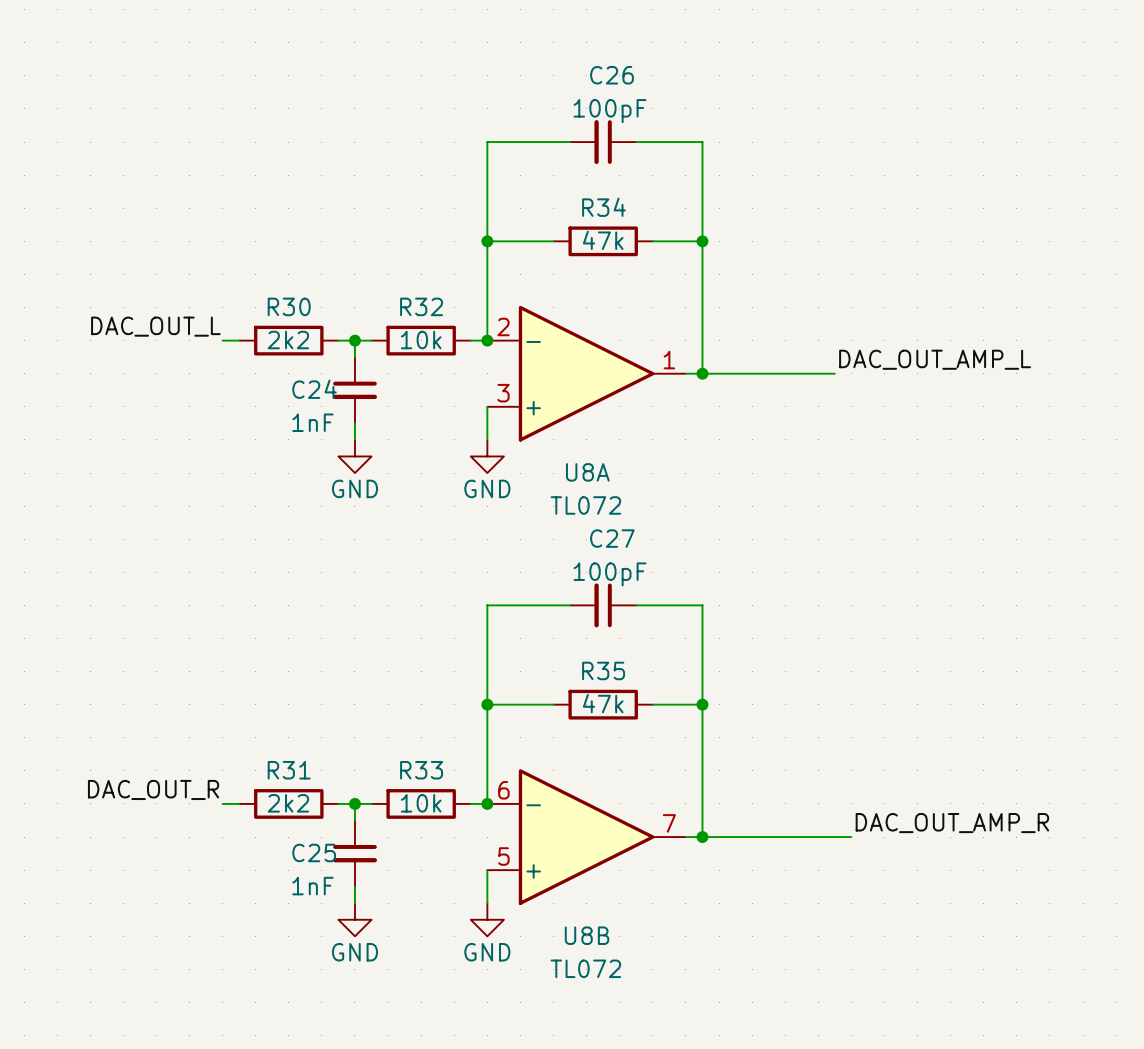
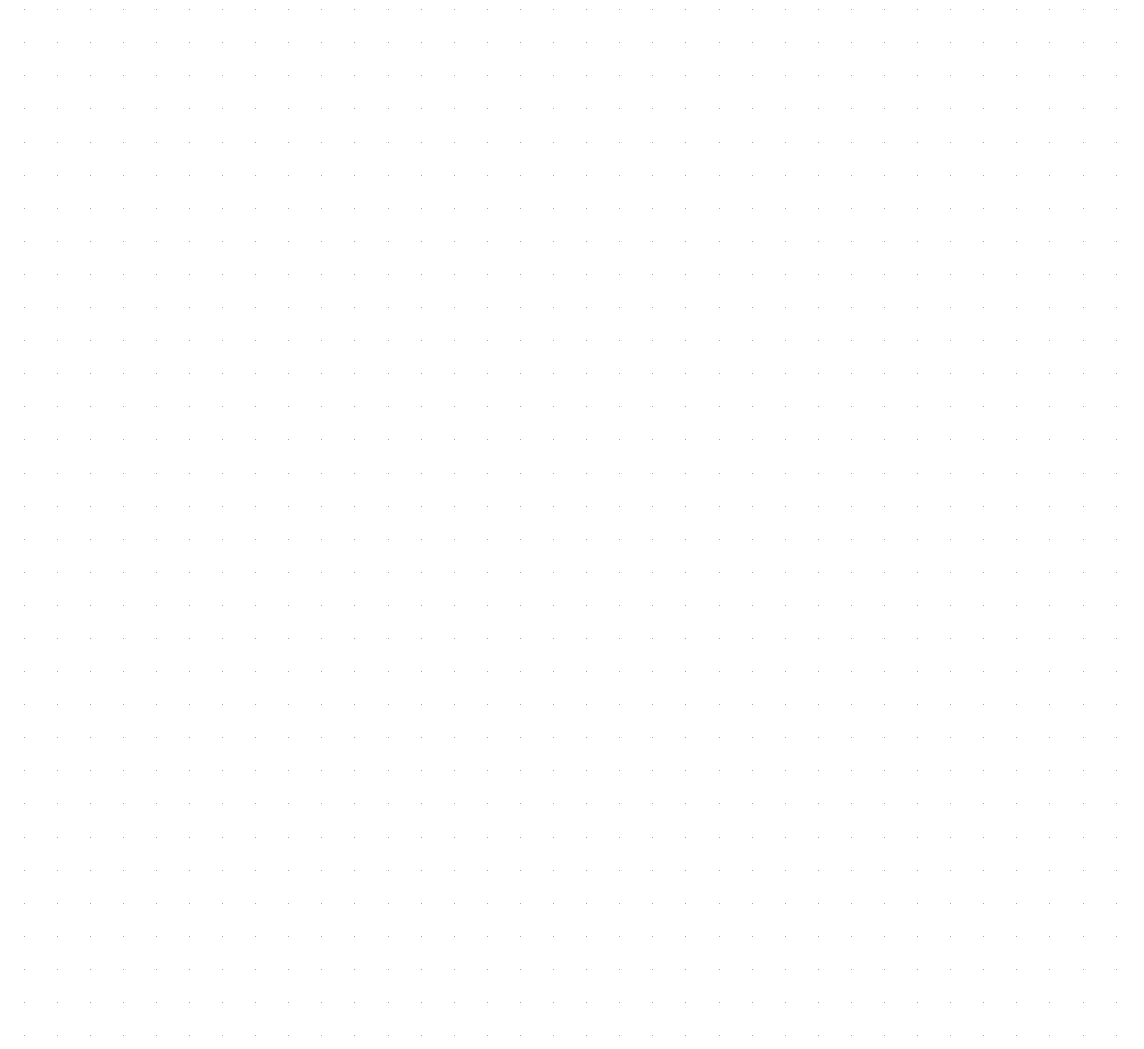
wire: (570, 142) (487, 142) (487, 340) (470, 340) -> none
C26: 100pF (603, 142) -> none
wire: (636, 142) (702, 142) (702, 373) -> none
wire: (487, 241) (553, 241) -> none
junction: (487, 241) -> none
R34: 47k (603, 241) -> none
wire: (652, 241) (702, 241) -> none
junction: (702, 241) -> none
label: DAC_OUT_L (155, 326) -> none
wire: (222, 340) (239, 340) -> none
R30: 2k2 (288, 340) -> none
wire: (338, 340) (371, 340) -> none
wire: (354, 340) (354, 357) -> none
junction: (354, 340) -> none
R32: 10k (421, 340) -> none
junction: (487, 340) -> none
label: DAC_OUT_AMP_L (935, 359) -> none
U8A: TL072 (586, 373) -> none
wire: (685, 373) (834, 373) -> none
junction: (702, 373) -> none
C24: 1nF (354, 390) -> none
wire: (487, 406) (487, 439) -> none
wire: (354, 423) (354, 439) -> none
power symbol: GND (354, 456) -> none
power symbol: GND (487, 456) -> none
wire: (570, 605) (487, 605) (487, 803) (470, 803) -> none
C27: 100pF (603, 605) -> none
wire: (636, 605) (702, 605) (702, 837) -> none
wire: (487, 704) (553, 704) -> none
junction: (487, 704) -> none
R35: 47k (603, 704) -> none
wire: (652, 704) (702, 704) -> none
junction: (702, 704) -> none
label: DAC_OUT_R (153, 789) -> none
wire: (222, 803) (239, 803) -> none
R31: 2k2 (288, 803) -> none
wire: (338, 803) (371, 803) -> none
wire: (354, 803) (354, 820) -> none
junction: (354, 803) -> none
R33: 10k (421, 803) -> none
junction: (487, 803) -> none
label: DAC_OUT_AMP_R (952, 823) -> none
U8B: TL072 (586, 837) -> none
wire: (685, 837) (851, 837) -> none
junction: (702, 837) -> none
C25: 1nF (354, 853) -> none
wire: (487, 870) (487, 903) -> none
wire: (354, 886) (354, 903) -> none
power symbol: GND (354, 919) -> none
power symbol: GND (487, 919) -> none

